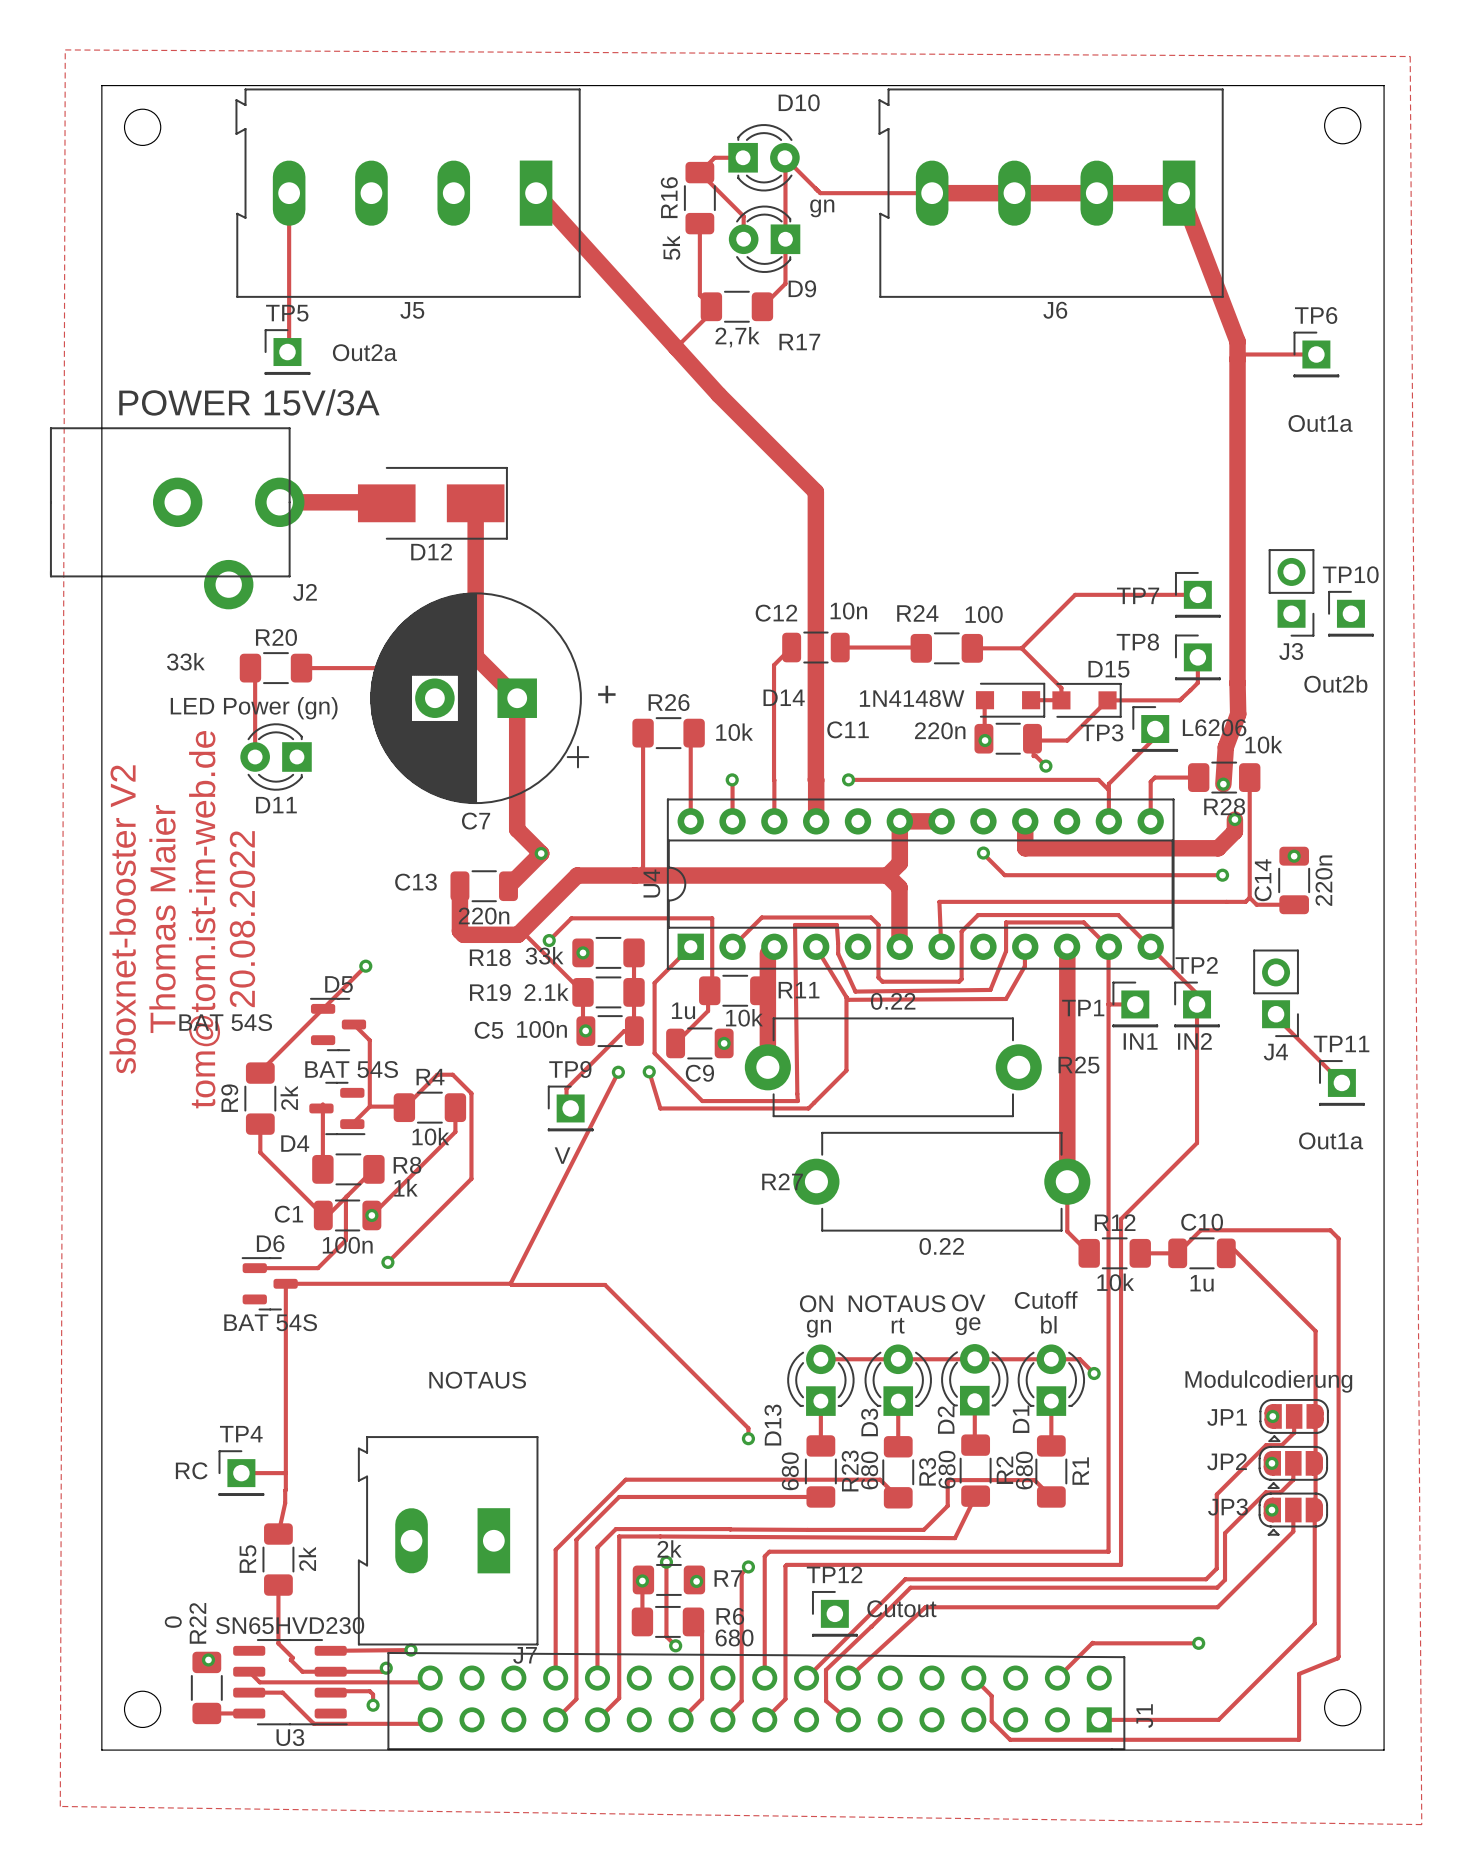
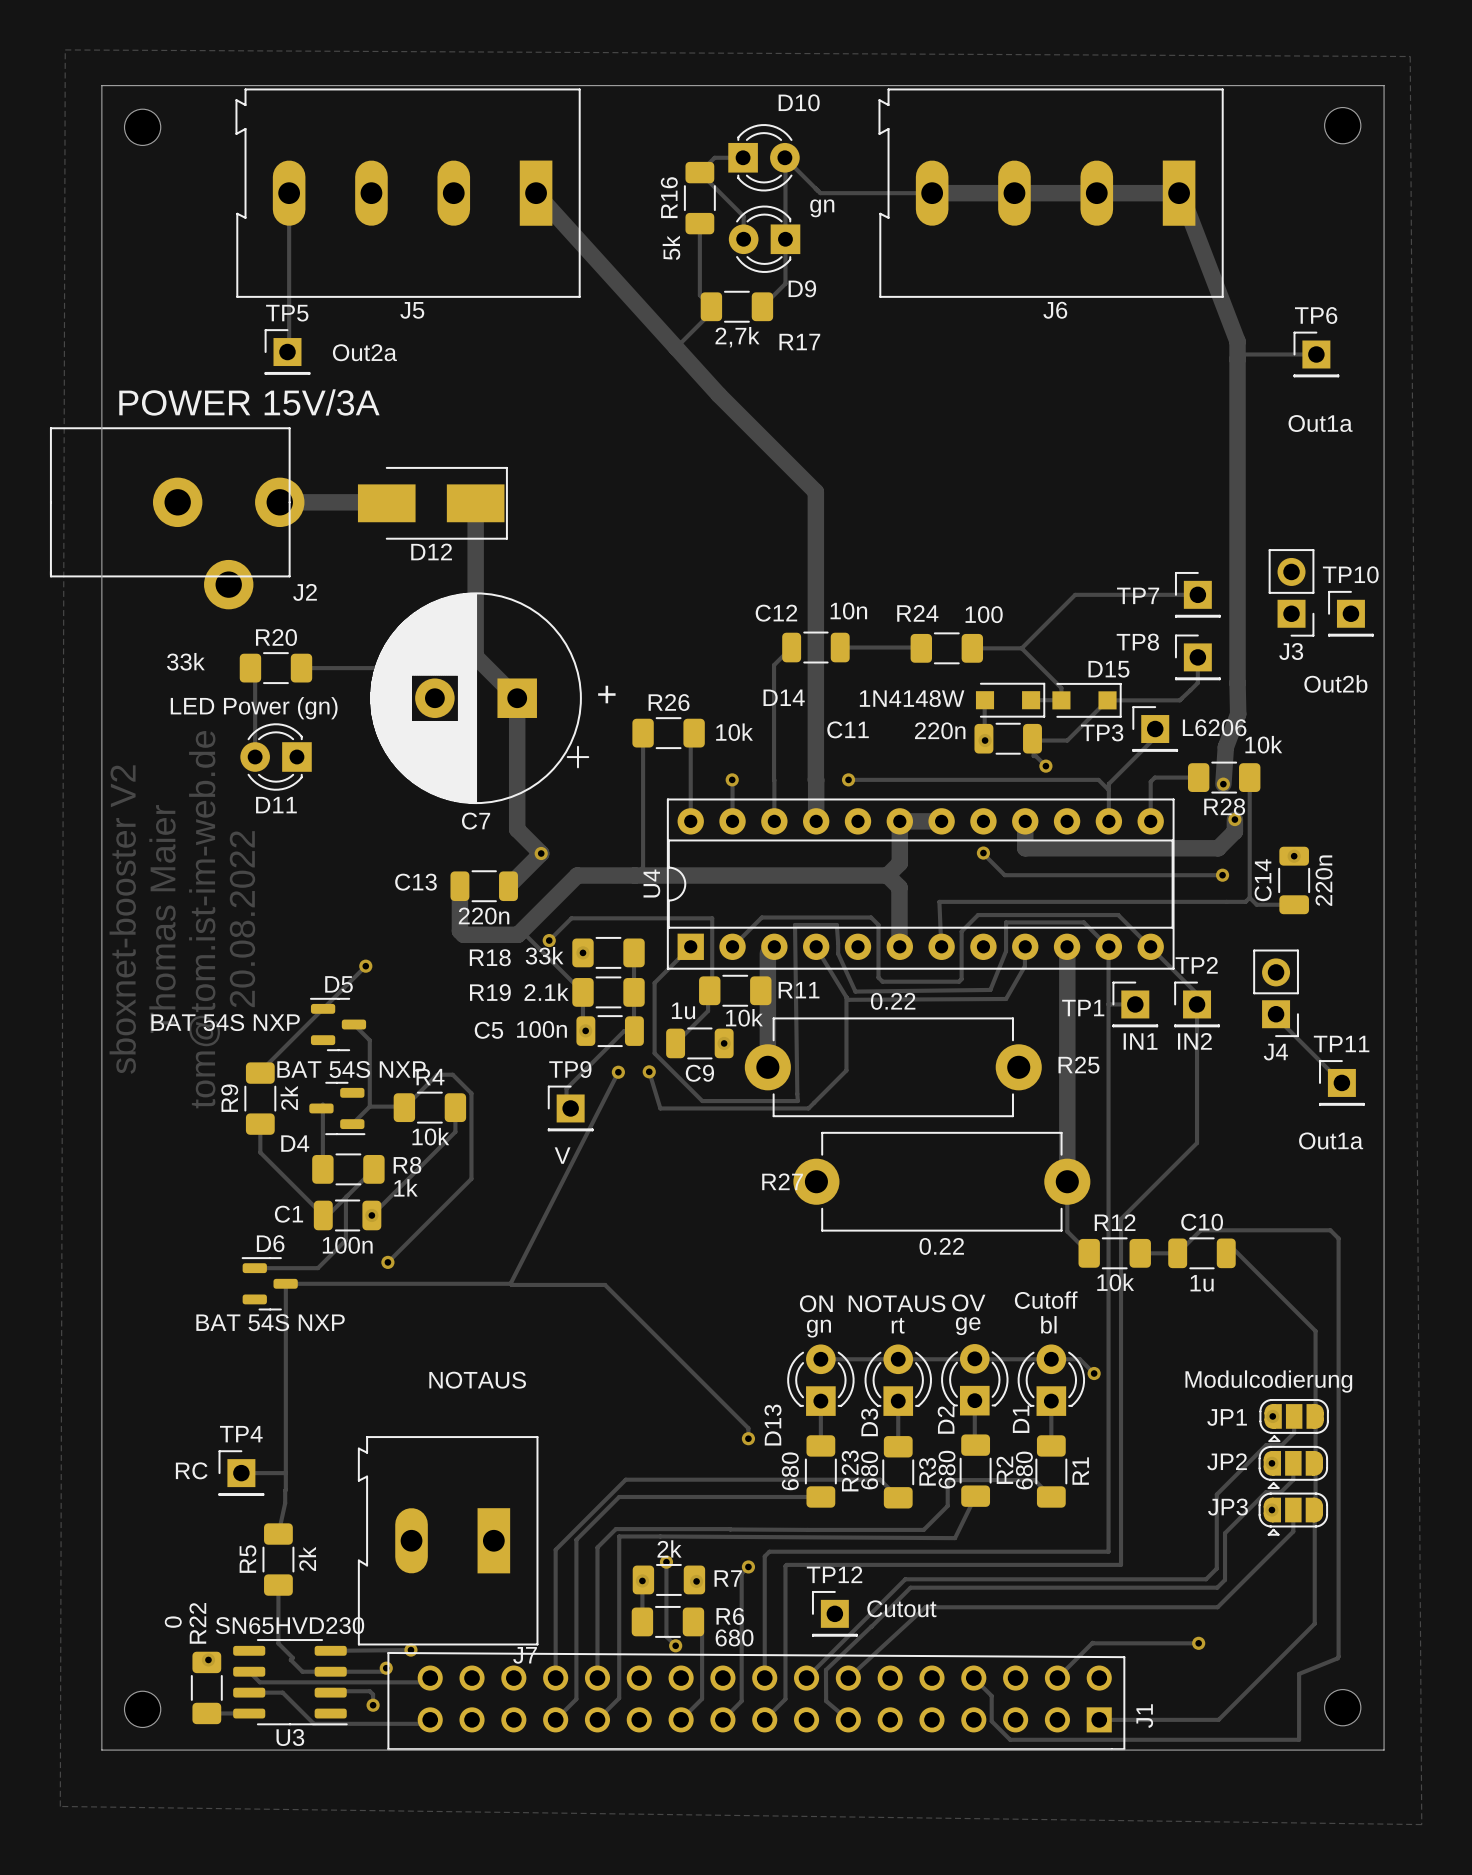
D5 value: BAT 54S (225, 1022) -> BAT 54S NXP (225, 1022)
D4 value: BAT 54S (351, 1069) -> BAT 54S NXP (351, 1069)
D6 value: BAT 54S (270, 1322) -> BAT 54S NXP (270, 1322)

